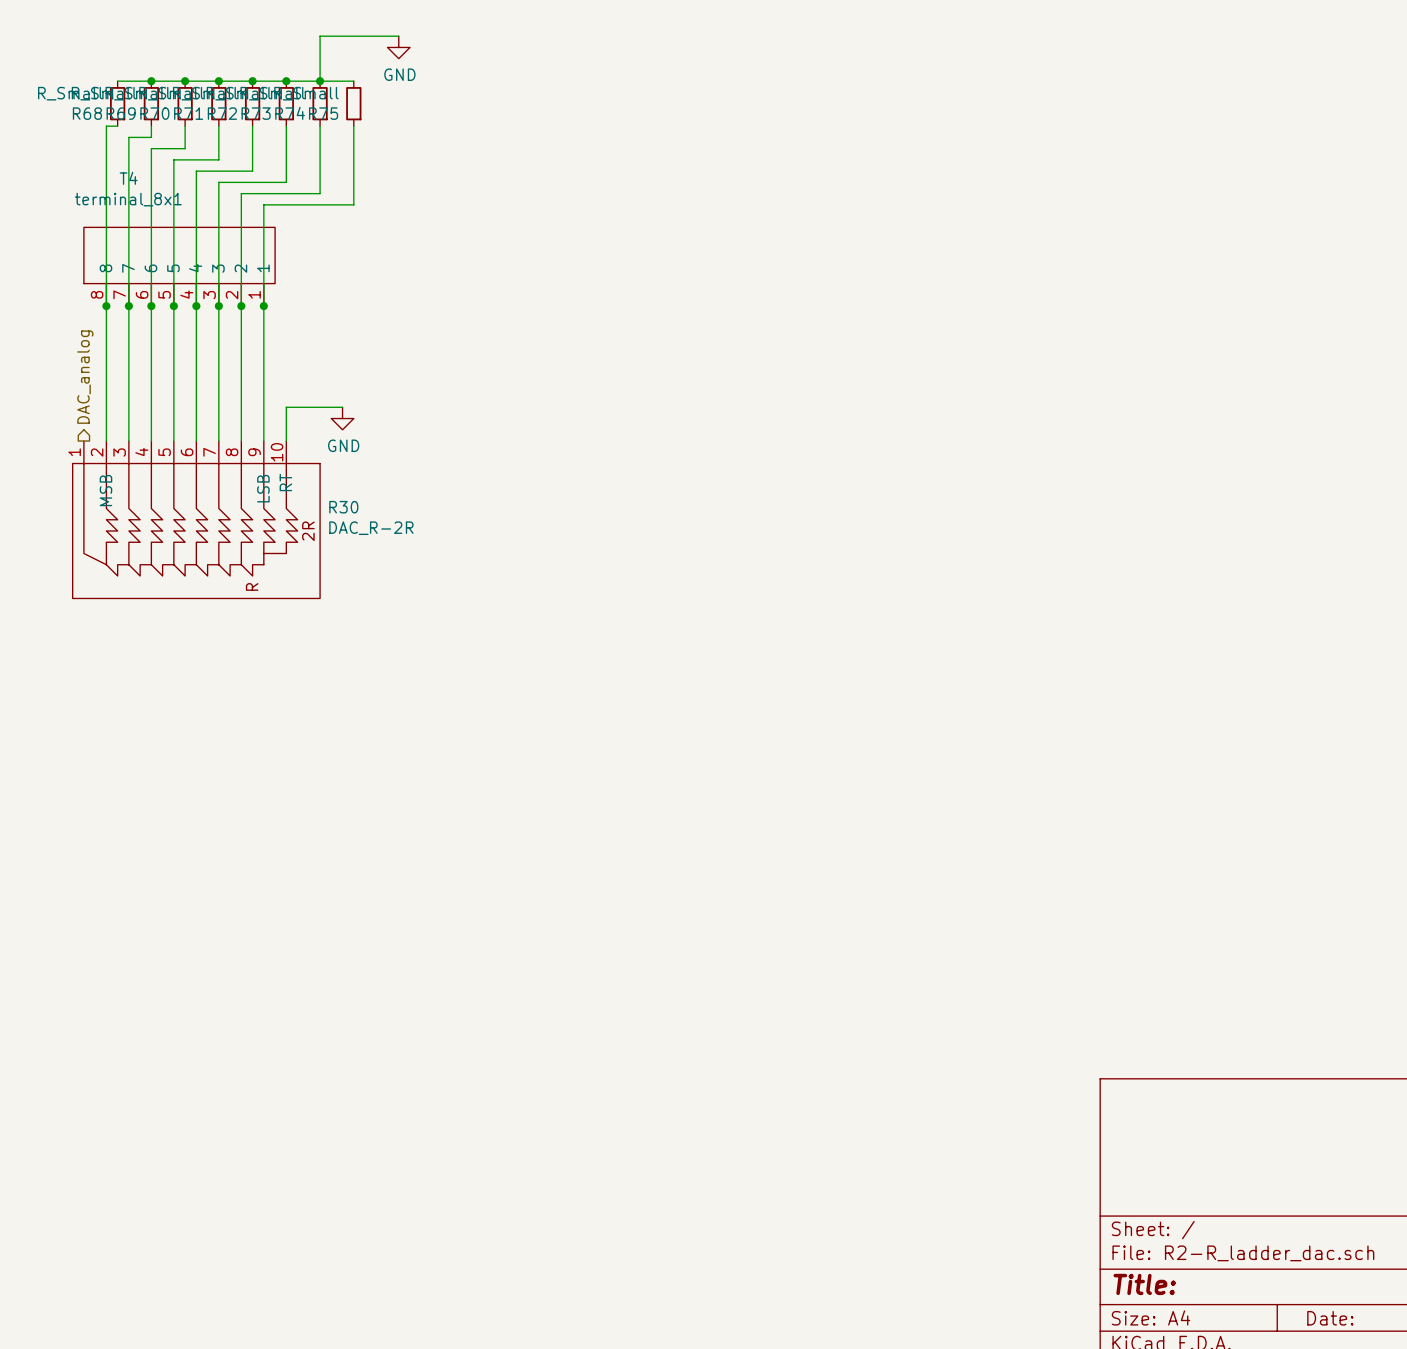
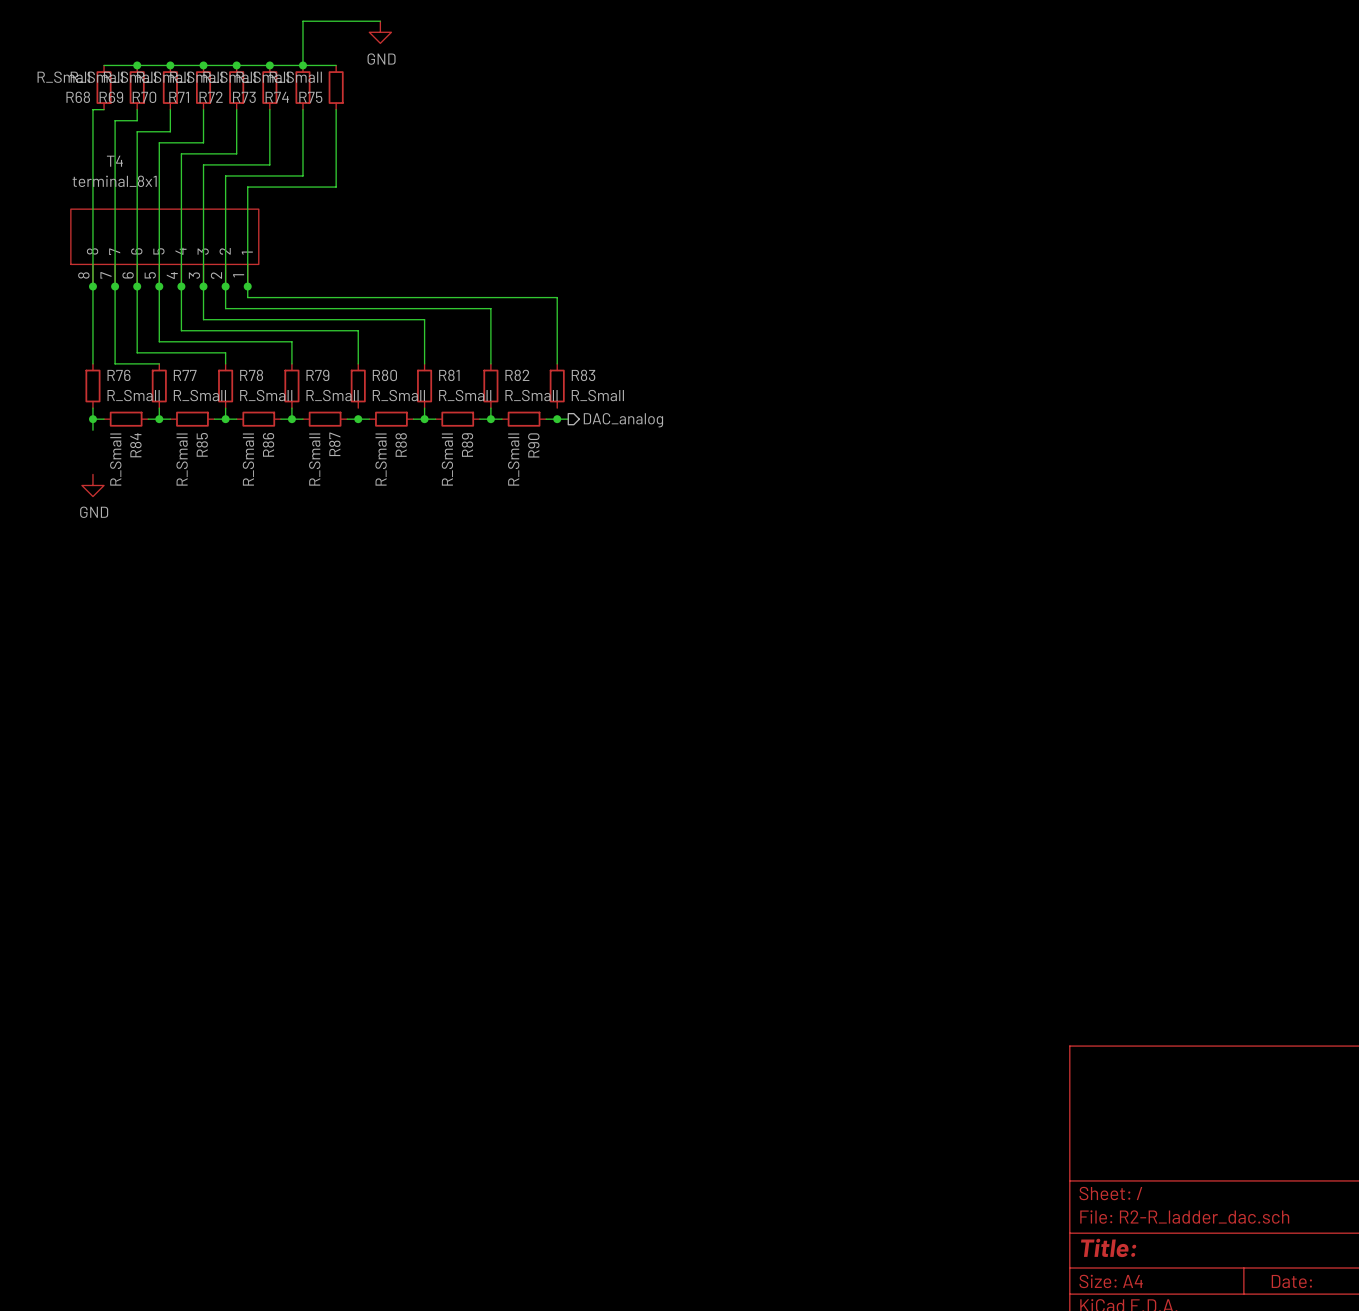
wire: (263, 317) (263, 441) -> (247, 297) (557, 297) (557, 363)
wire: (241, 328) (241, 373) -> (137, 352) (225, 352)
wire: none -> (225, 308) (490, 308) (490, 363)
wire: (218, 339) (218, 441) -> (203, 319) (424, 319) (424, 363)
wire: (196, 351) (196, 441) -> (181, 330) (358, 330) (358, 363)
wire: (173, 362) (173, 429) -> (159, 341) (291, 341) (291, 363)
wire: (151, 373) (151, 441) -> none
hierarchical label: DAC_analog (85, 377) -> none
wire: (106, 384) (106, 429) -> none
wire: (128, 384) (128, 441) -> (115, 363) (159, 363)
wire: (241, 384) (241, 429) -> none
R76: none -> R_Small (92, 386)
R77: none -> R_Small (159, 386)
R78: none -> R_Small (225, 386)
R79: none -> R_Small (291, 386)
wire: (342, 407) (286, 407) (286, 441) -> none
R80: none -> R_Small (358, 386)
R81: none -> R_Small (424, 386)
R82: none -> R_Small (490, 386)
R83: none -> R_Small (557, 386)
power symbol: GND (342, 418) -> none
wire: none -> (291, 408) (291, 419)
wire: none -> (424, 408) (424, 419)
wire: none -> (490, 408) (490, 419)
junction: none -> (92, 419)
wire: none -> (104, 419) (92, 419) (92, 430)
R84: none -> R_Small (126, 419)
wire: none -> (148, 419) (170, 419)
junction: none -> (159, 419)
R85: none -> R_Small (192, 419)
wire: none -> (214, 419) (236, 419)
junction: none -> (225, 419)
R86: none -> R_Small (258, 419)
wire: none -> (280, 419) (302, 419)
junction: none -> (291, 419)
R87: none -> R_Small (325, 419)
wire: none -> (347, 419) (369, 419)
junction: none -> (358, 419)
R88: none -> R_Small (391, 419)
wire: none -> (413, 419) (435, 419)
junction: none -> (424, 419)
R89: none -> R_Small (457, 419)
wire: none -> (479, 419) (501, 419)
junction: none -> (490, 419)
R90: none -> R_Small (524, 419)
wire: none -> (546, 419) (568, 419)
junction: none -> (557, 419)
hierarchical label: none -> DAC_analog (623, 420)
power symbol: none -> GND (92, 485)
R30: DAC_R-2R (196, 519) -> none

